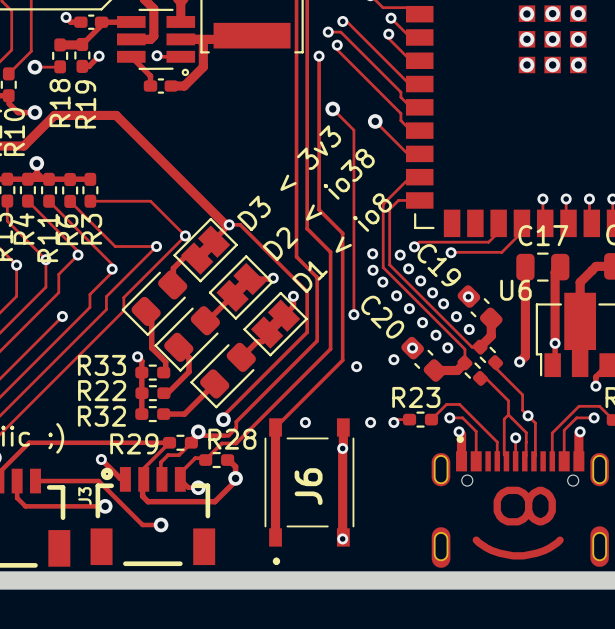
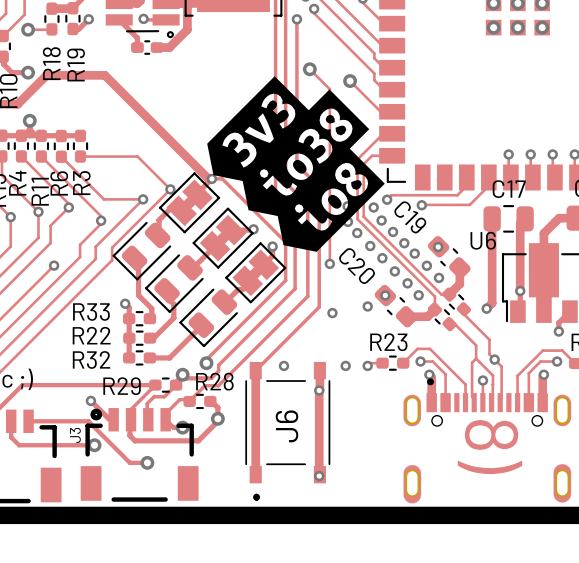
drawing: none -> [207, 76, 385, 252]
part: none -> (141, 251)
D3 < 3v3: (154, 303) -> none
part: none -> (174, 283)
D2 < io38: (187, 338) -> none
part: none -> (208, 317)
D1 < io8: (223, 375) -> none

